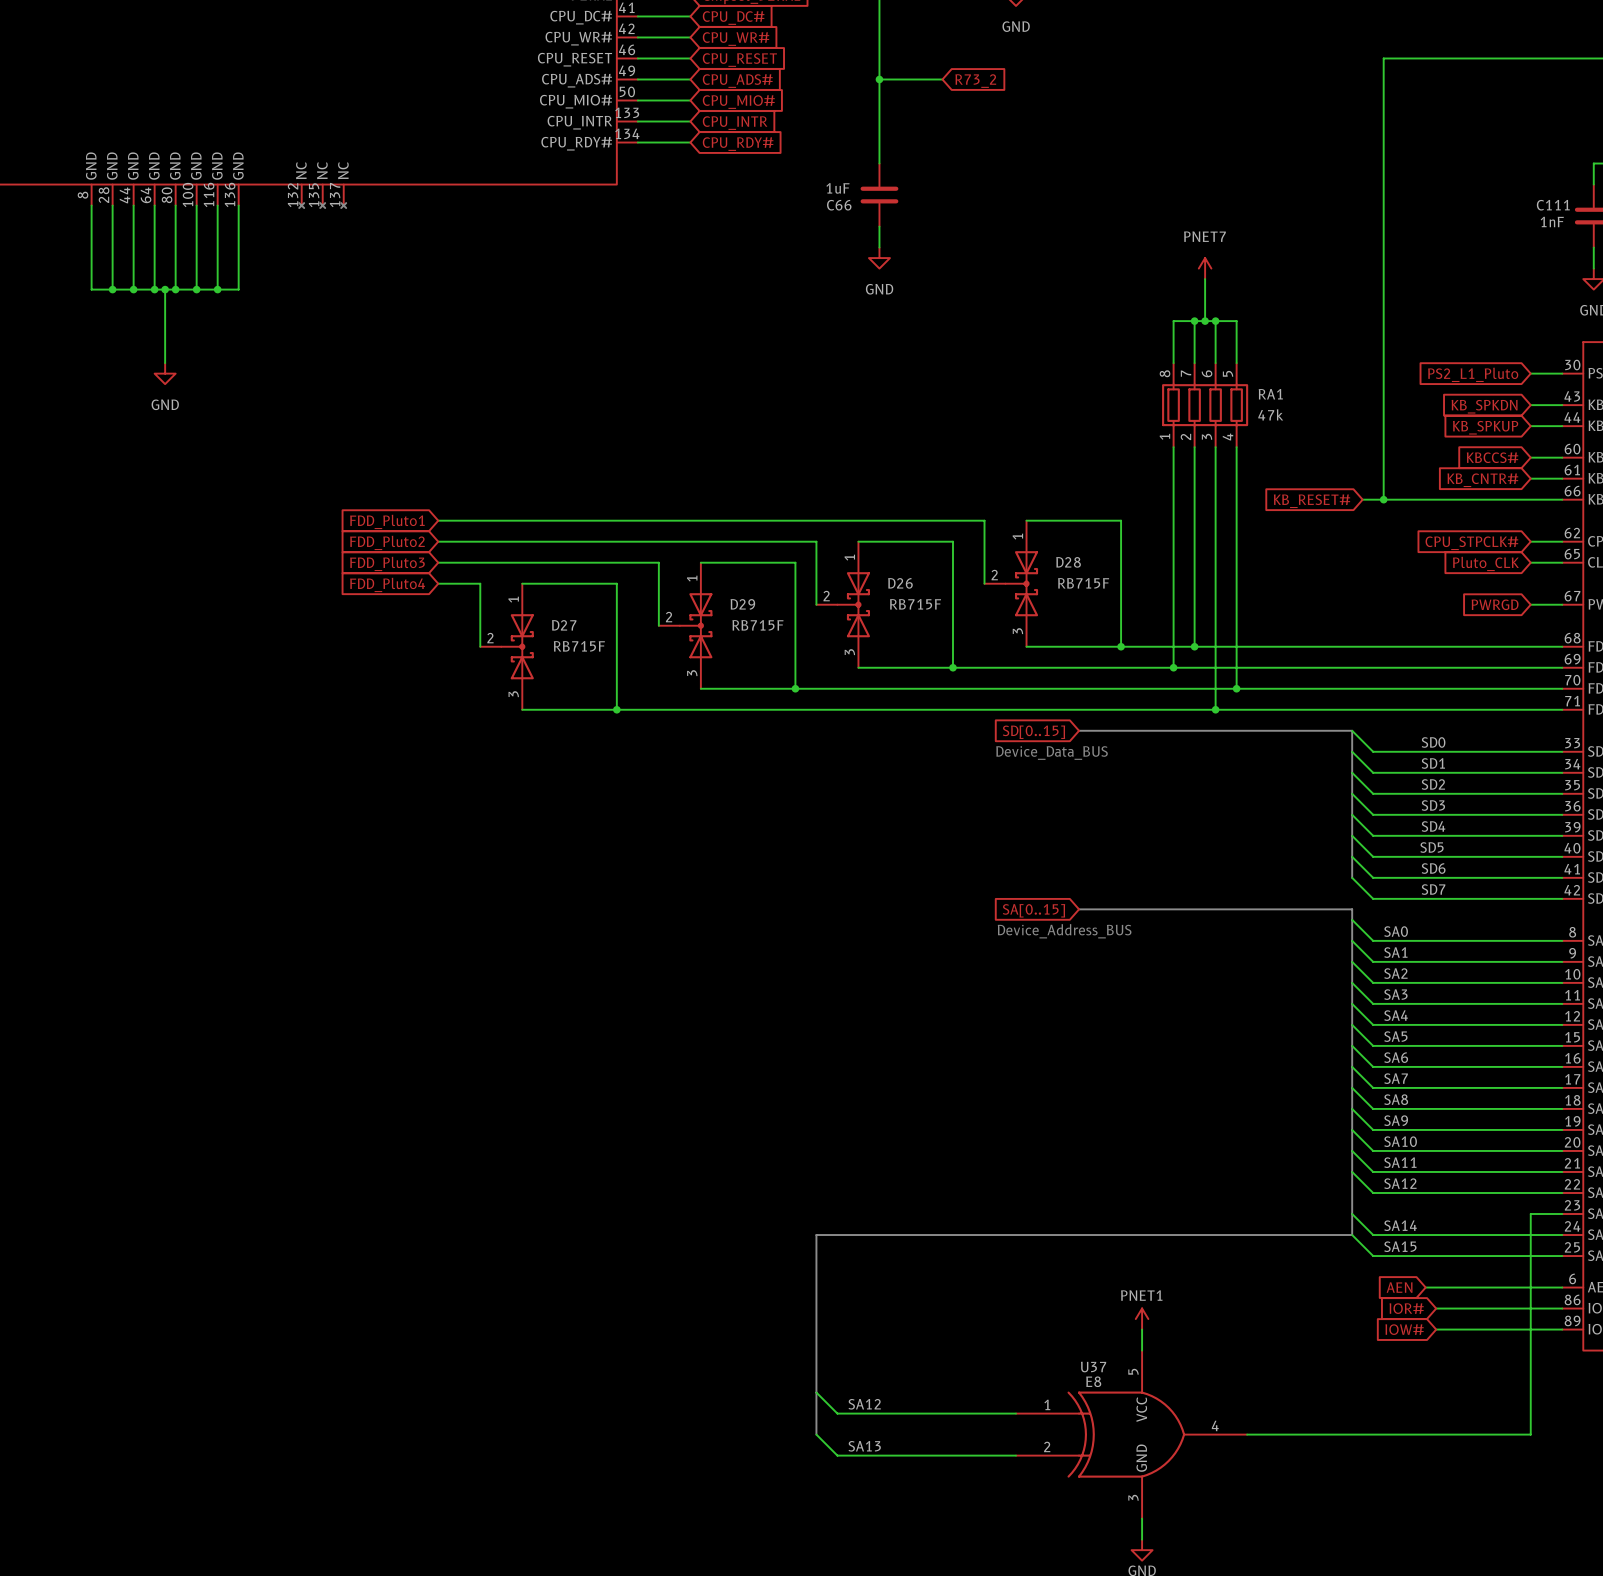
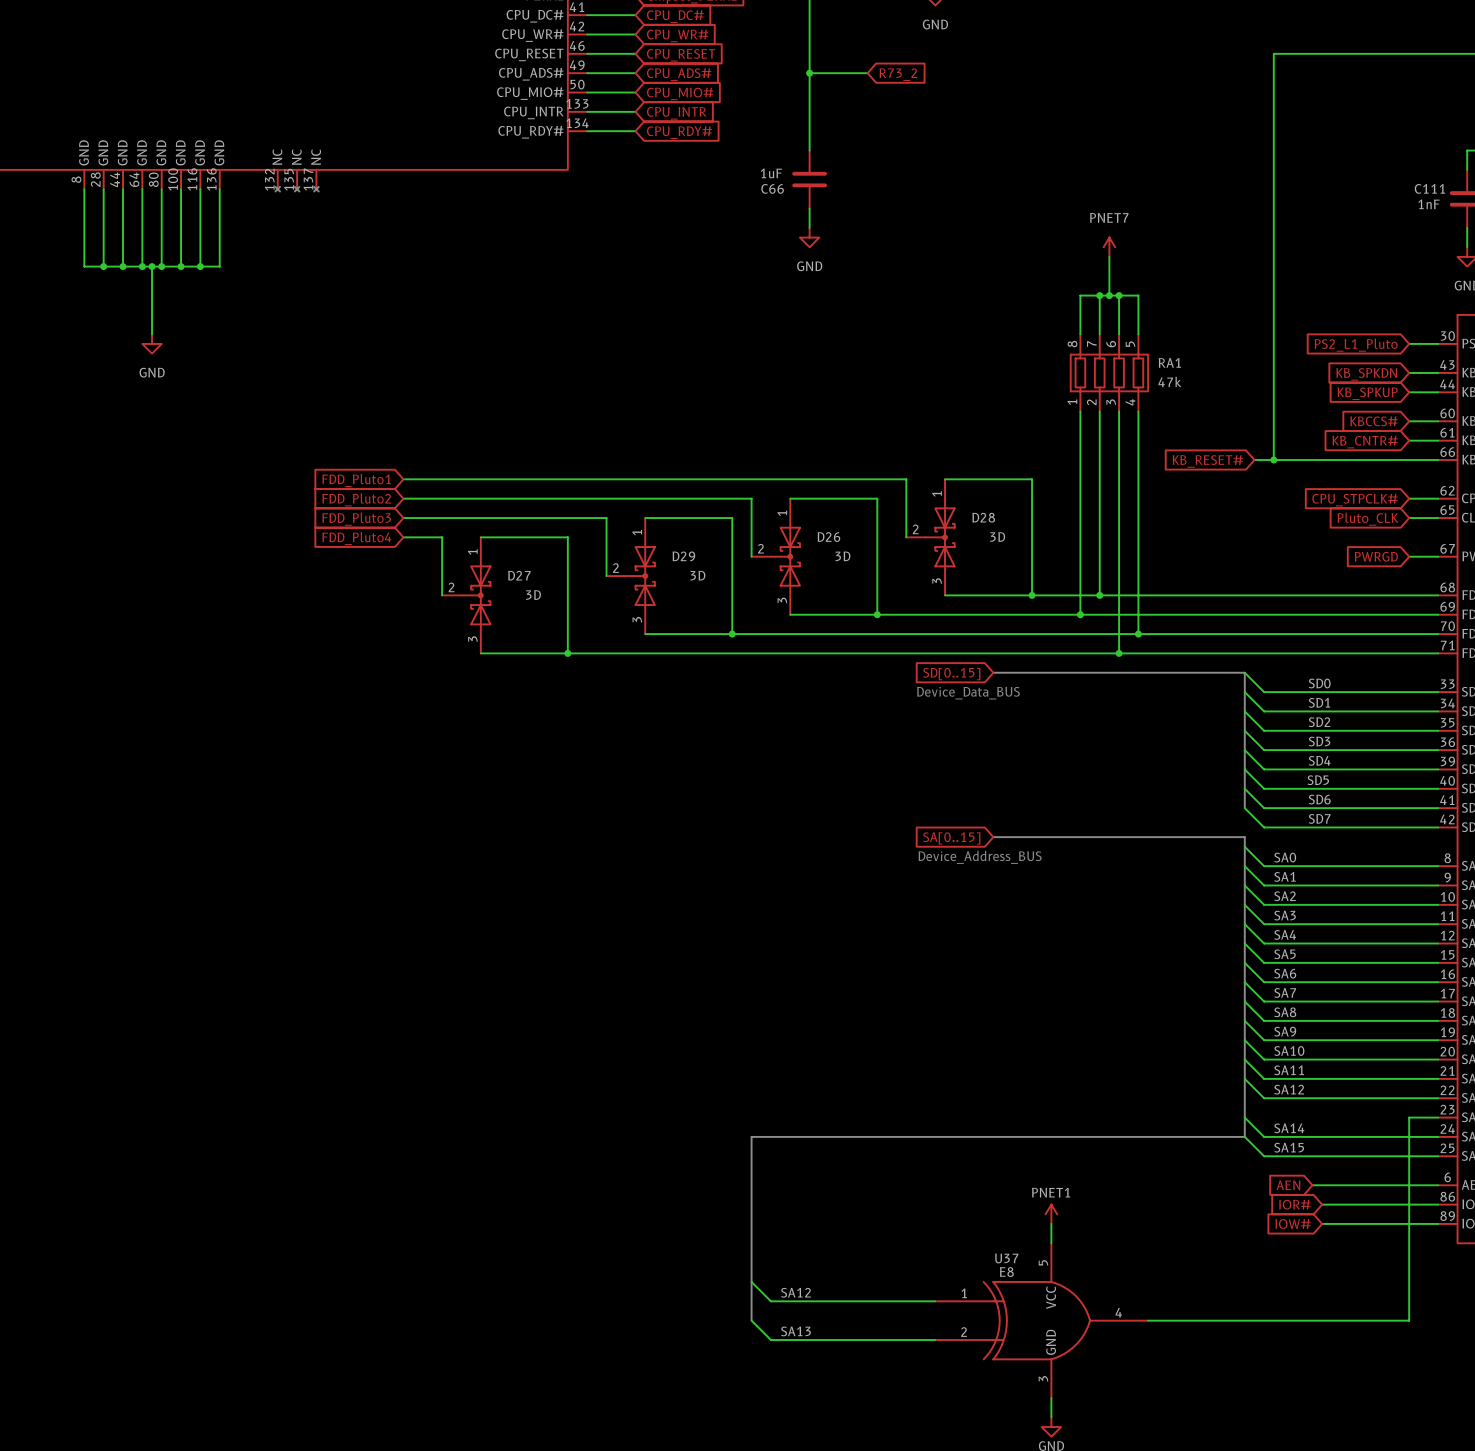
D28 value: RB715F (1083, 583) -> 3D (997, 537)
D26 value: RB715F (915, 604) -> 3D (842, 556)
D29 value: RB715F (757, 625) -> 3D (697, 575)
D27 value: RB715F (579, 646) -> 3D (533, 595)

